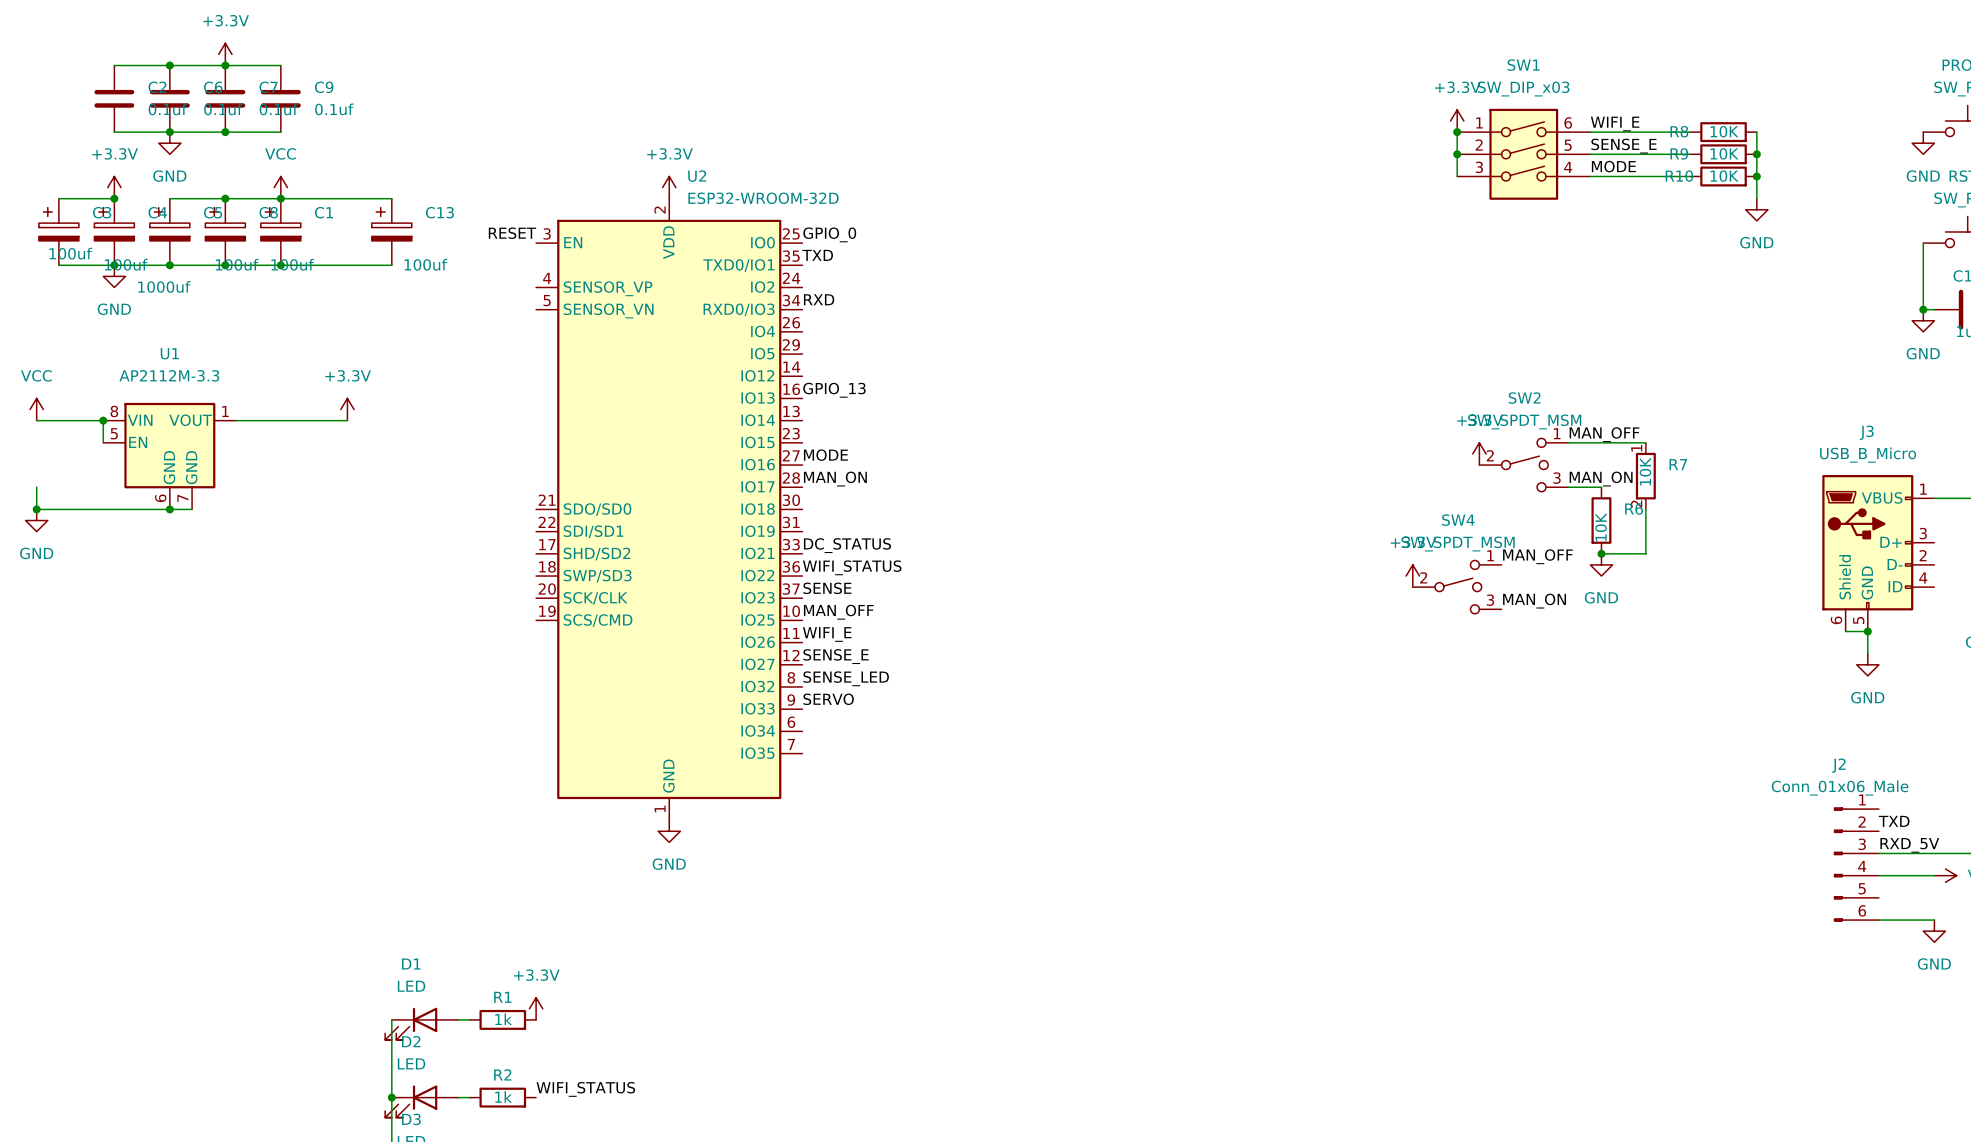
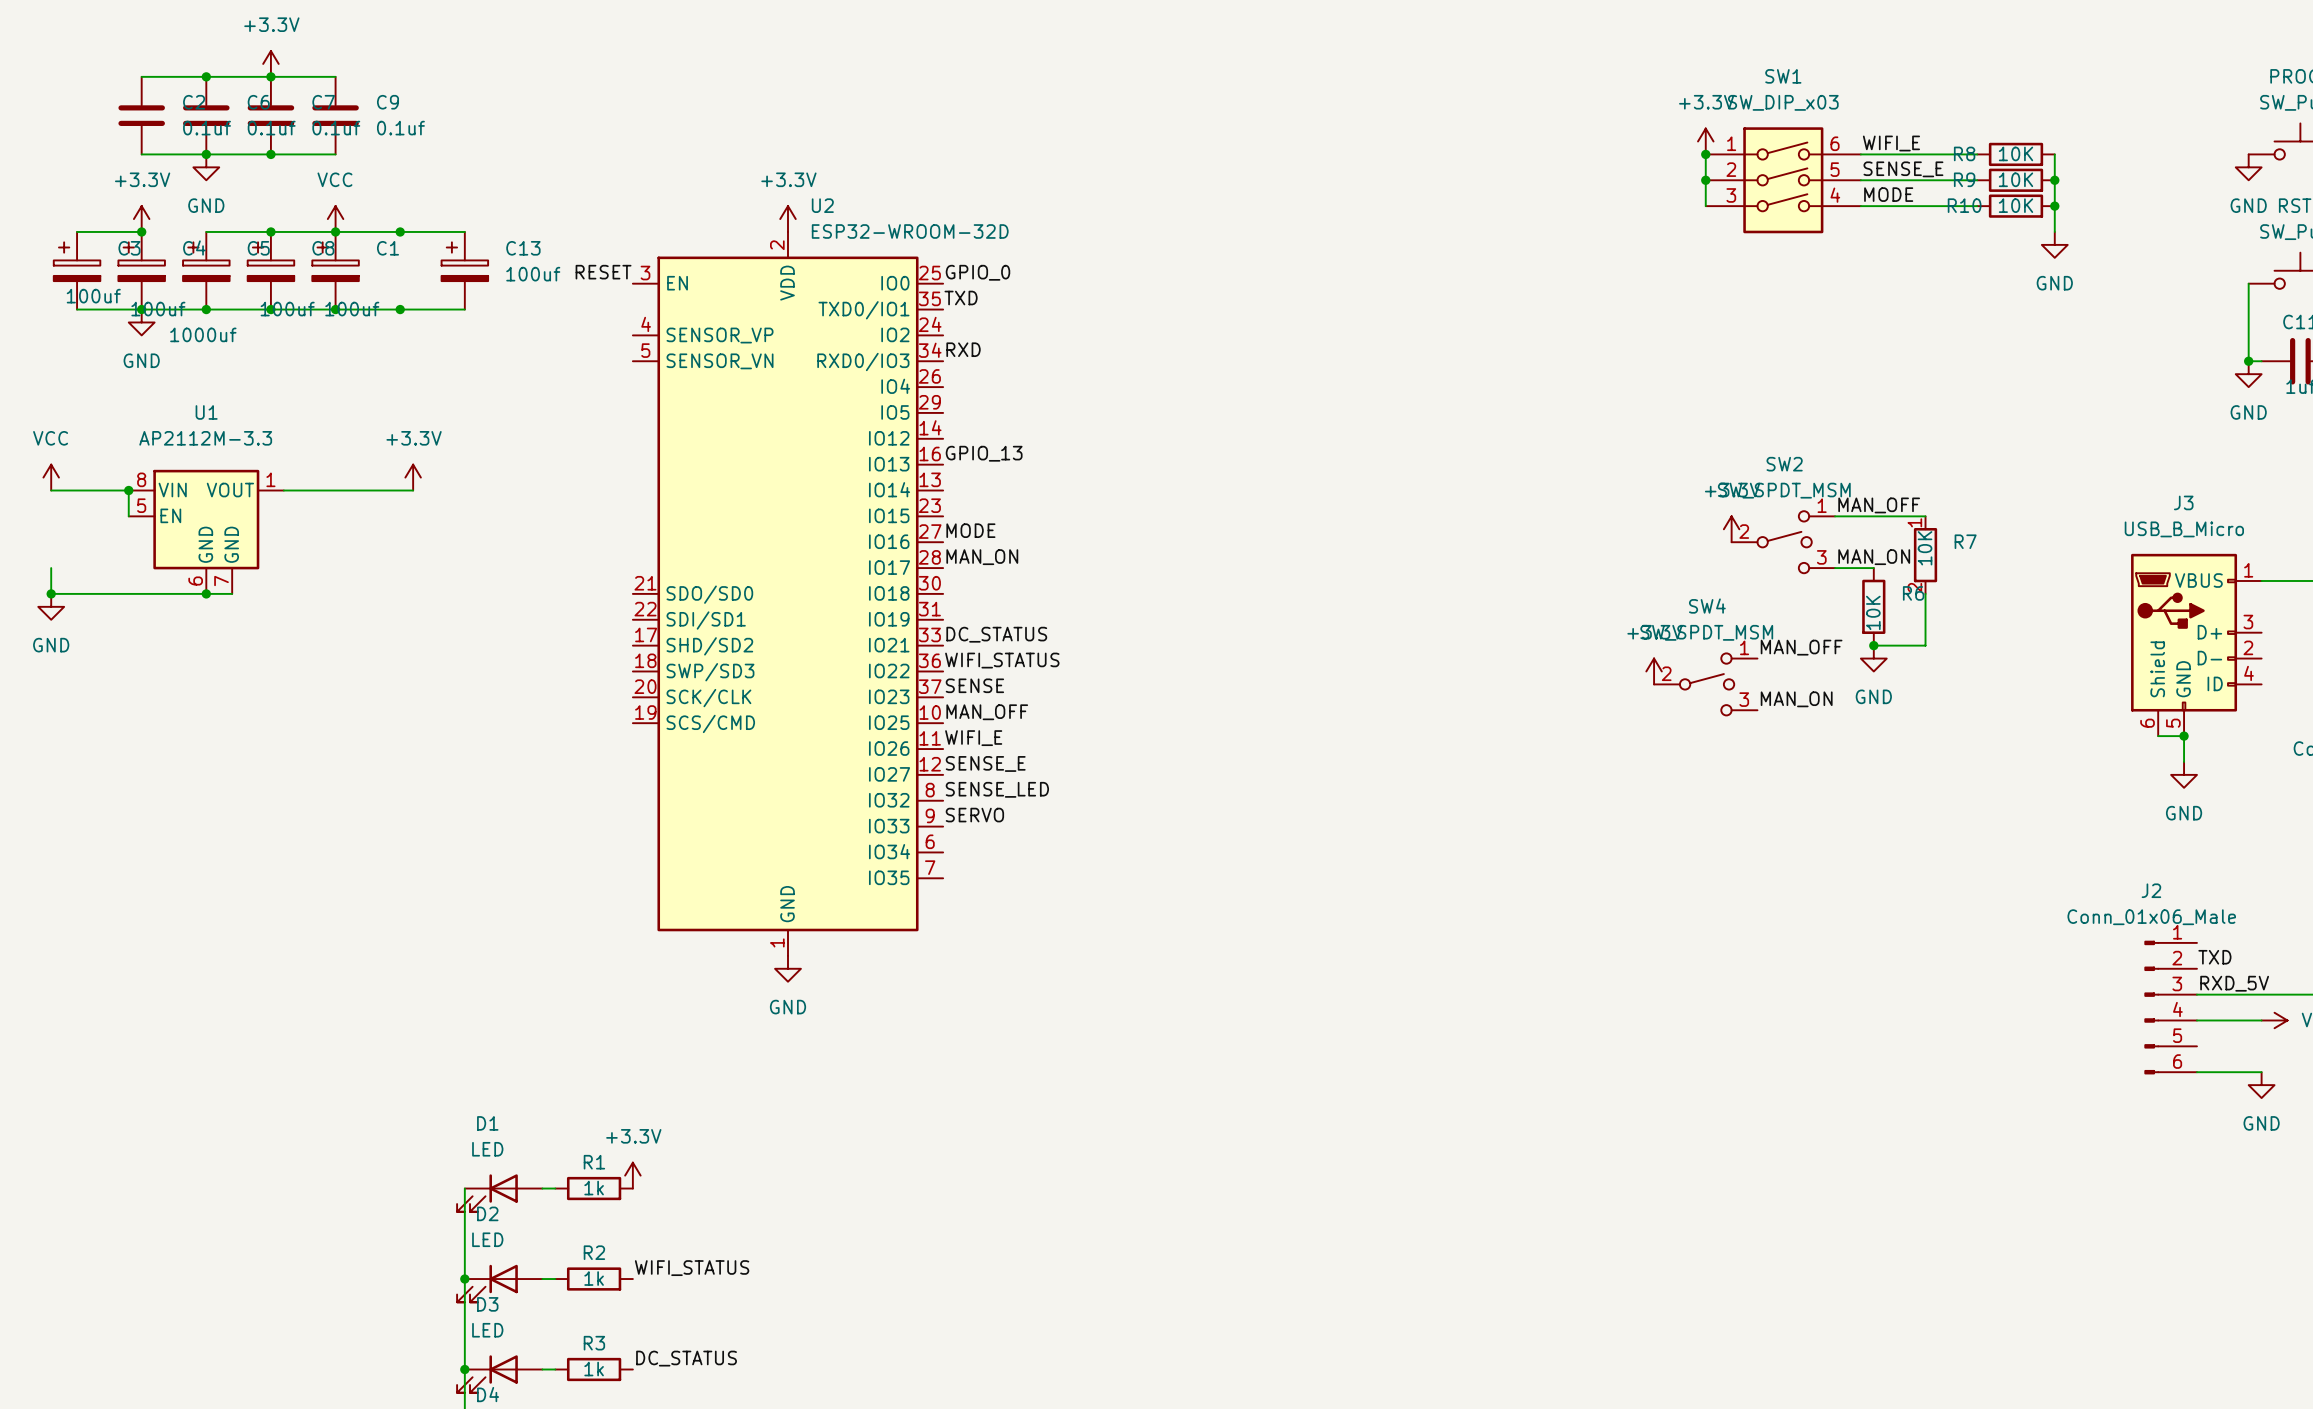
junction: none -> (400, 231)
C13 value position: 100uf (425, 264) -> 100uf (533, 274)
junction: none -> (400, 309)

